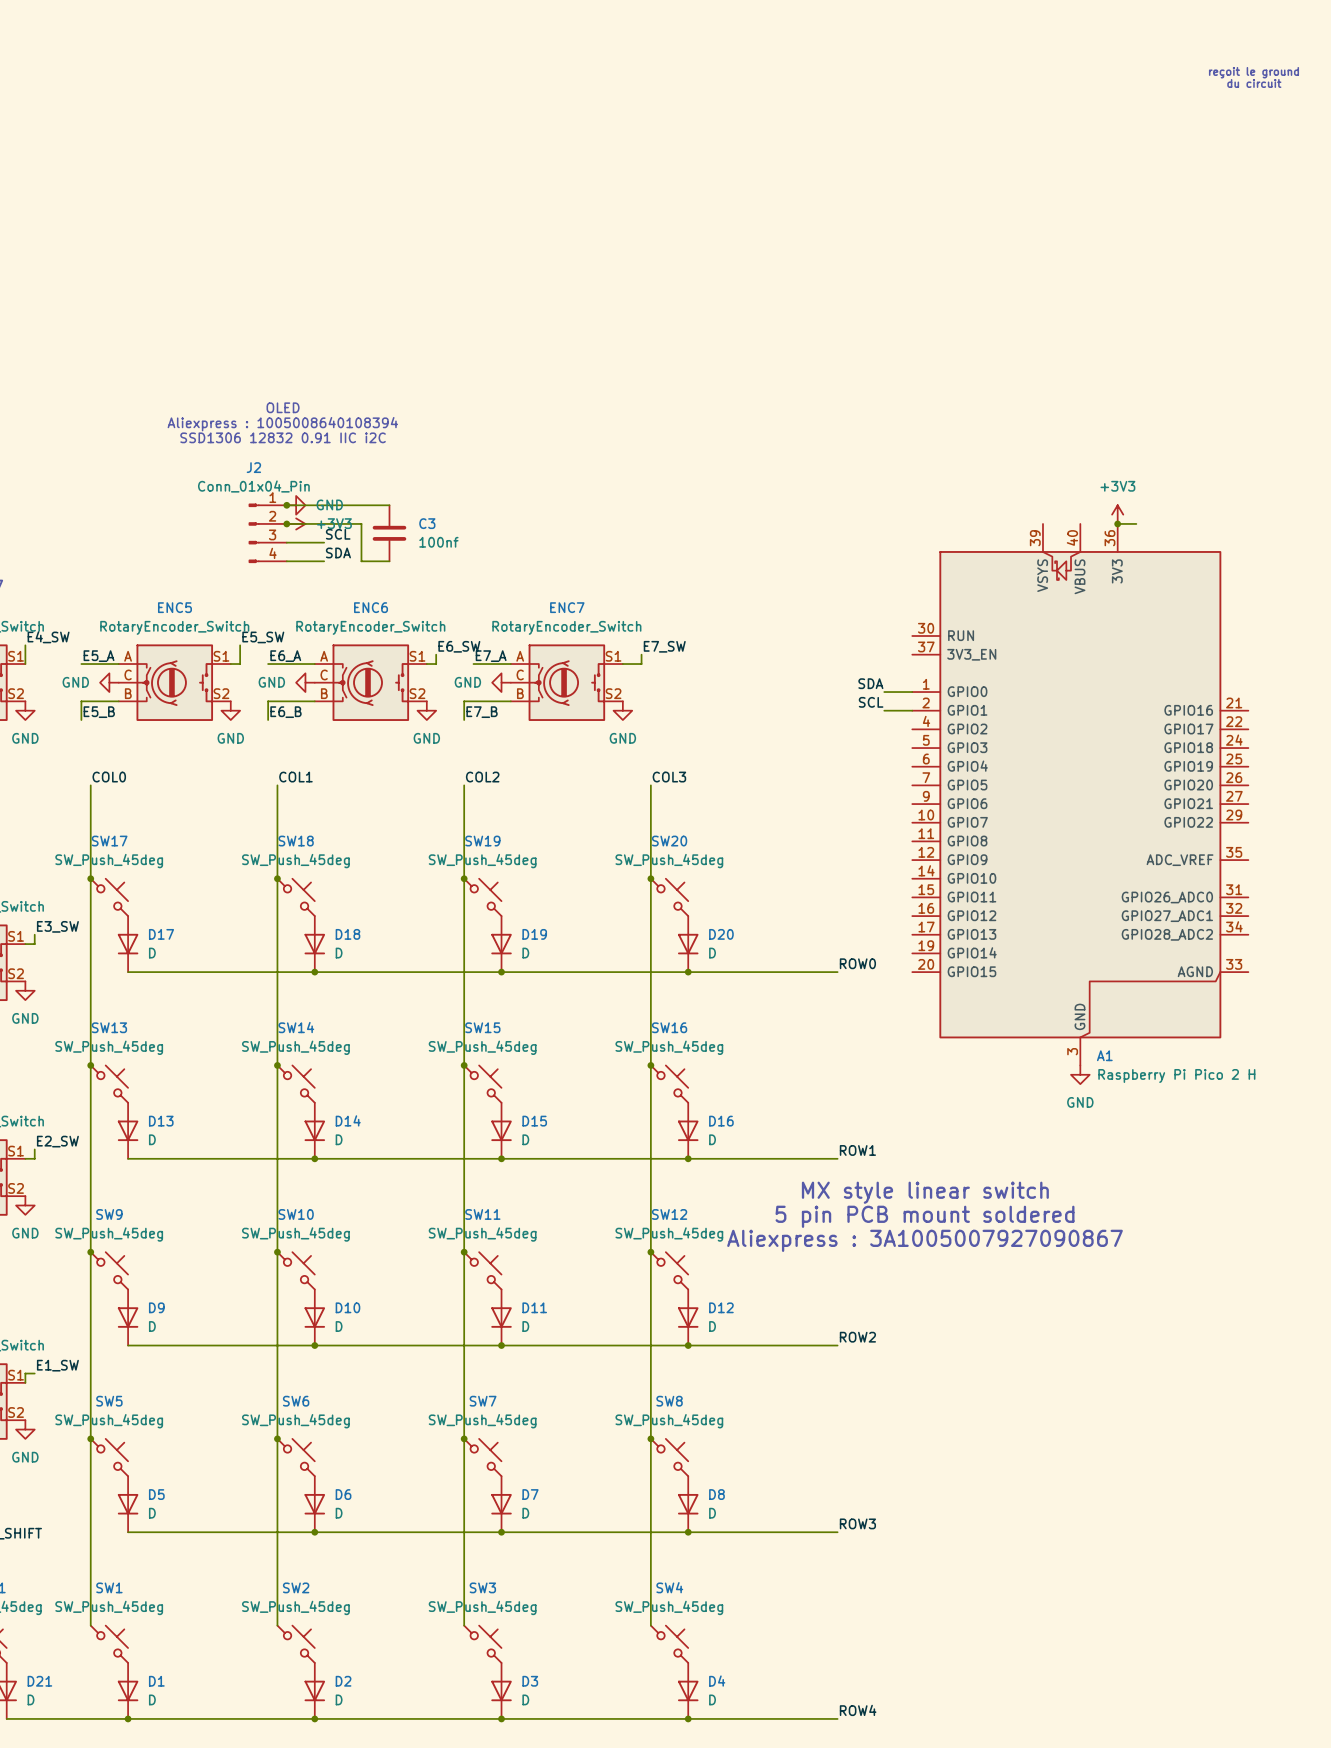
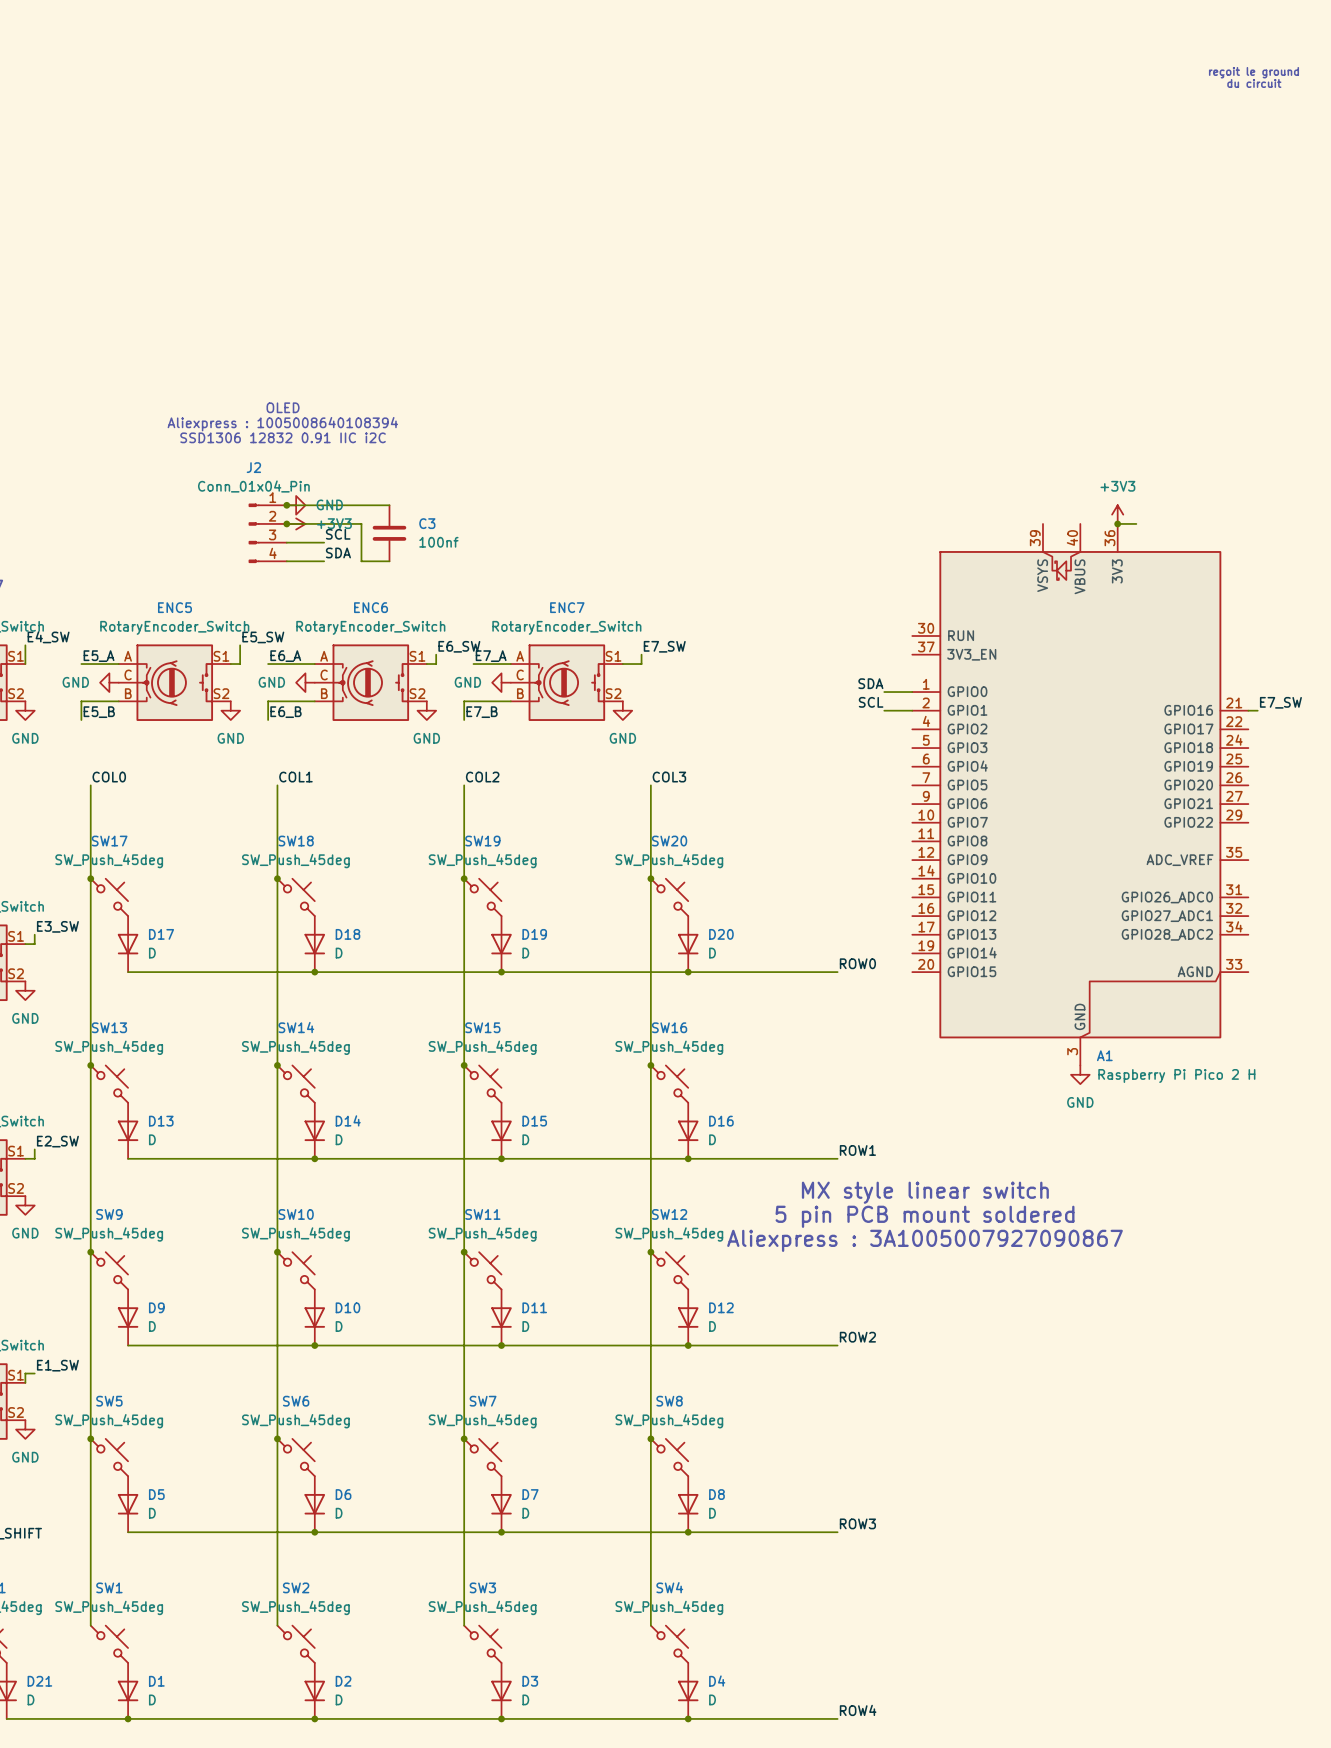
label: none -> E7_SW (1280, 702)
wire: none -> (1248, 710) (1257, 710)

